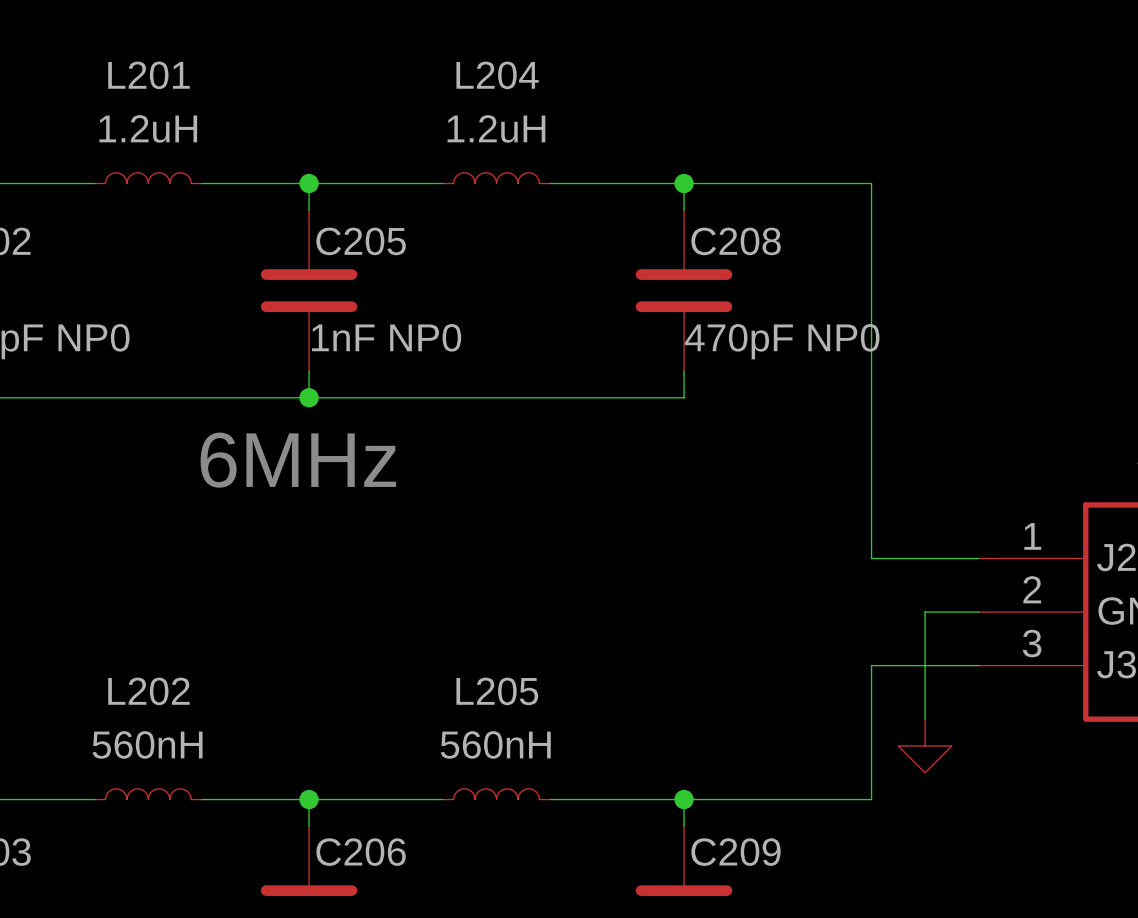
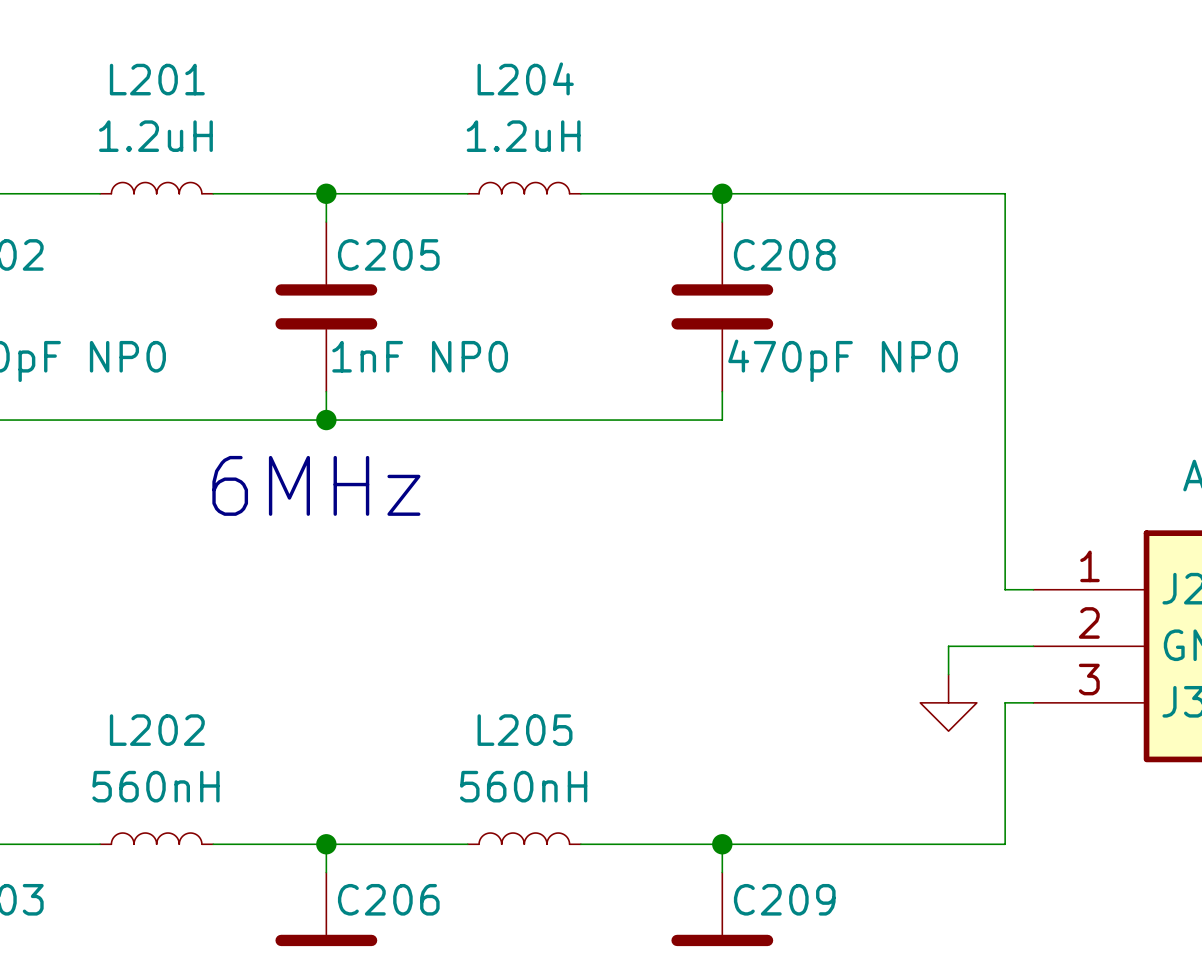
wire: (871, 183) (871, 558) (951, 558) -> (920, 193) (1005, 193) (1005, 589)
wire: (925, 612) (925, 719) -> (976, 646) (948, 646) (948, 674)
wire: (951, 665) (871, 665) (871, 799) -> (1005, 702) (1005, 844) (920, 844)
power symbol position: (925, 745) -> (948, 702)

